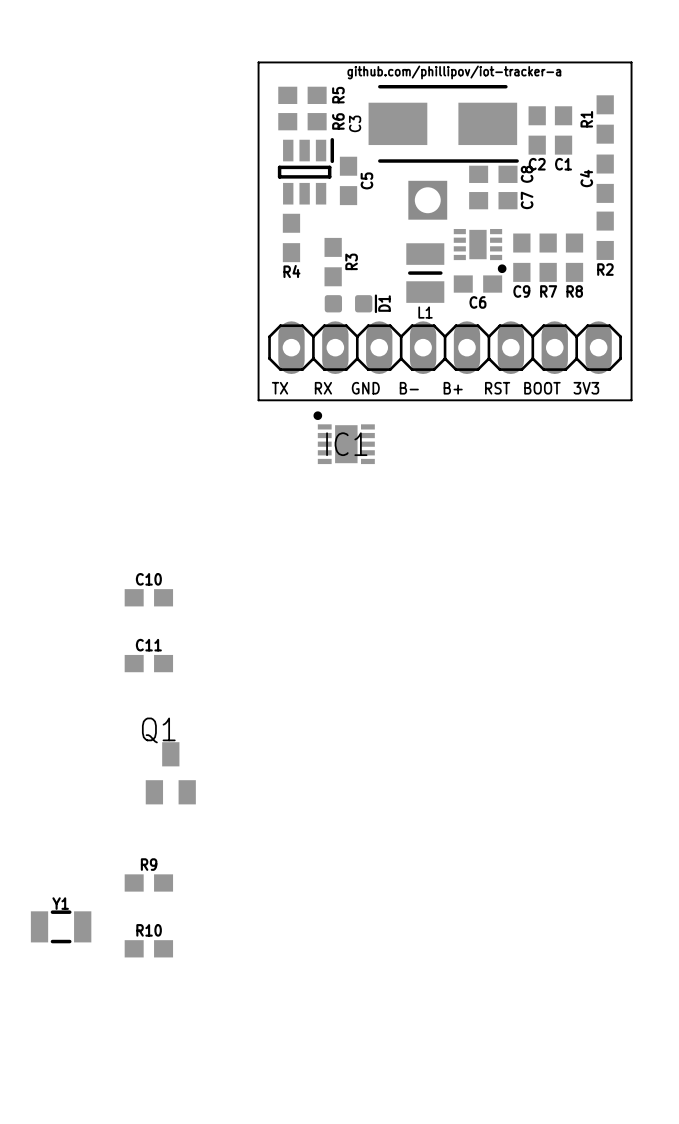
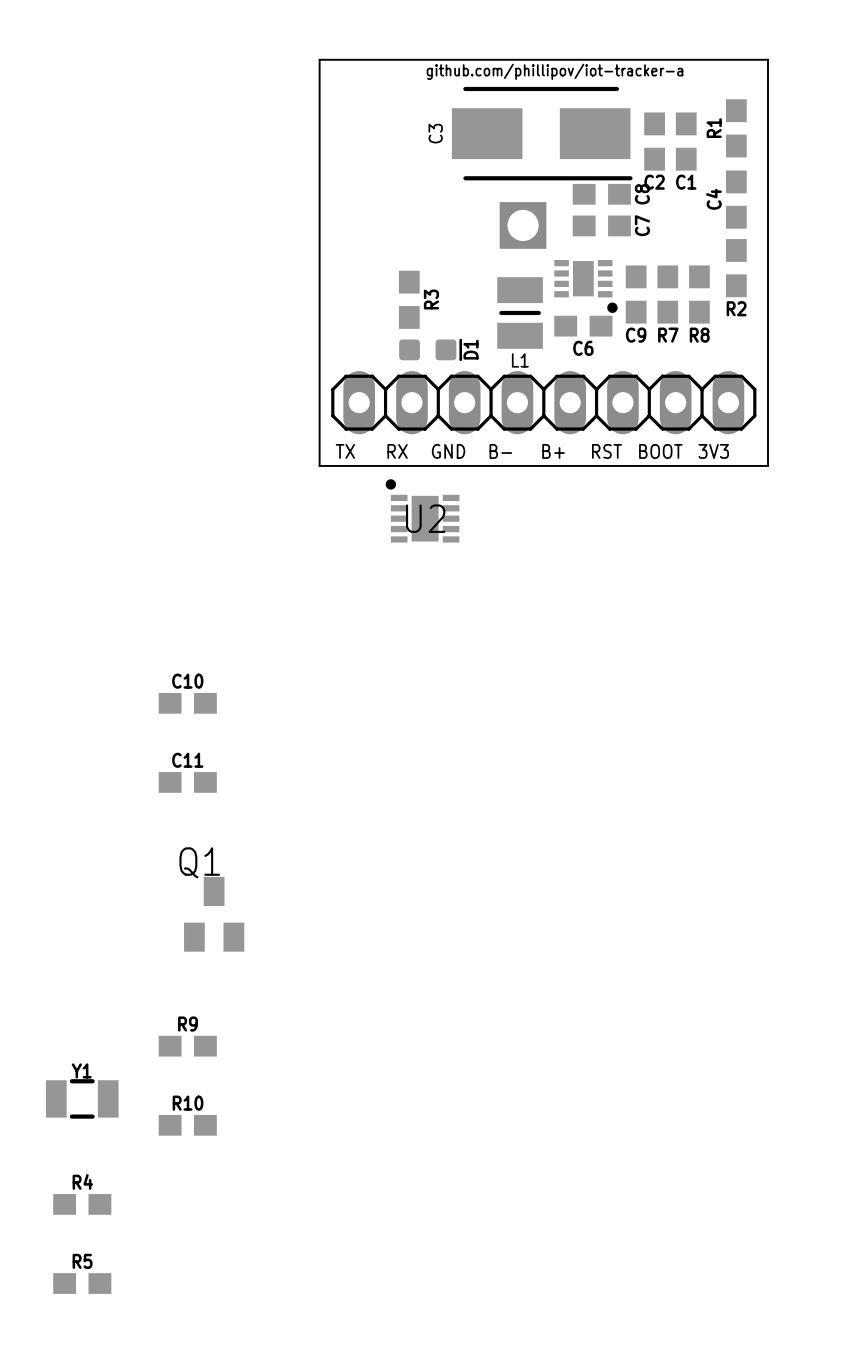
R5 position: (302, 95) -> (82, 1283)
R5 name rotation: 0° (338, 95) -> 90° clockwise (82, 1261)
R5 name position: R5 (338, 95) -> R5 (82, 1261)
R6: (302, 121) -> none
part: (305, 171) -> none
C5: (348, 180) -> none
R4 rotation: 0° (291, 237) -> 90° clockwise (82, 1204)
R4 position: (291, 237) -> (82, 1204)
R4 name position: R4 (291, 271) -> R4 (82, 1181)
IC1 name: IC1 (346, 444) -> U2 (425, 518)

